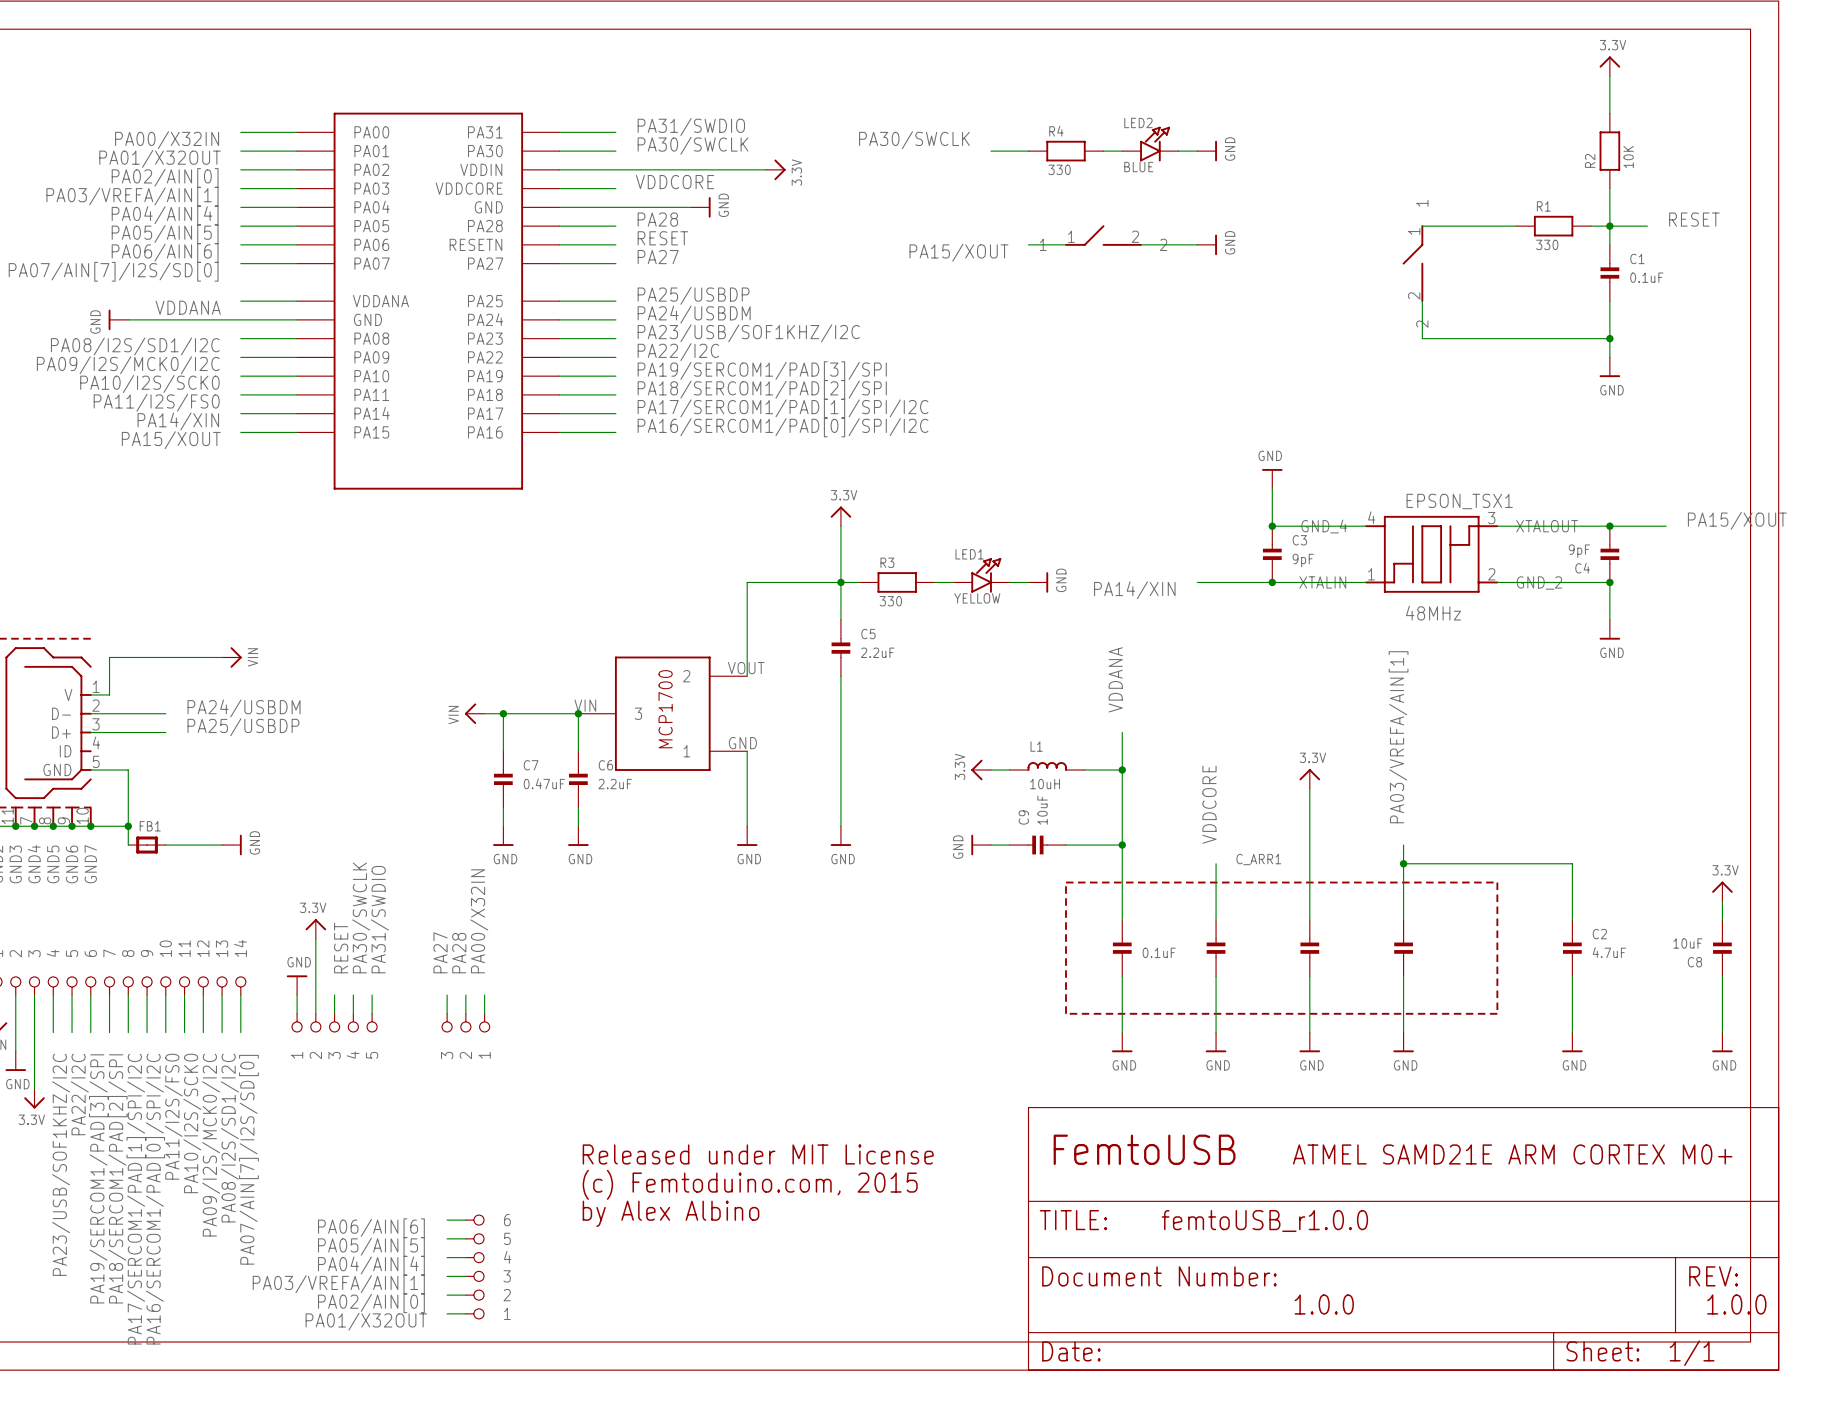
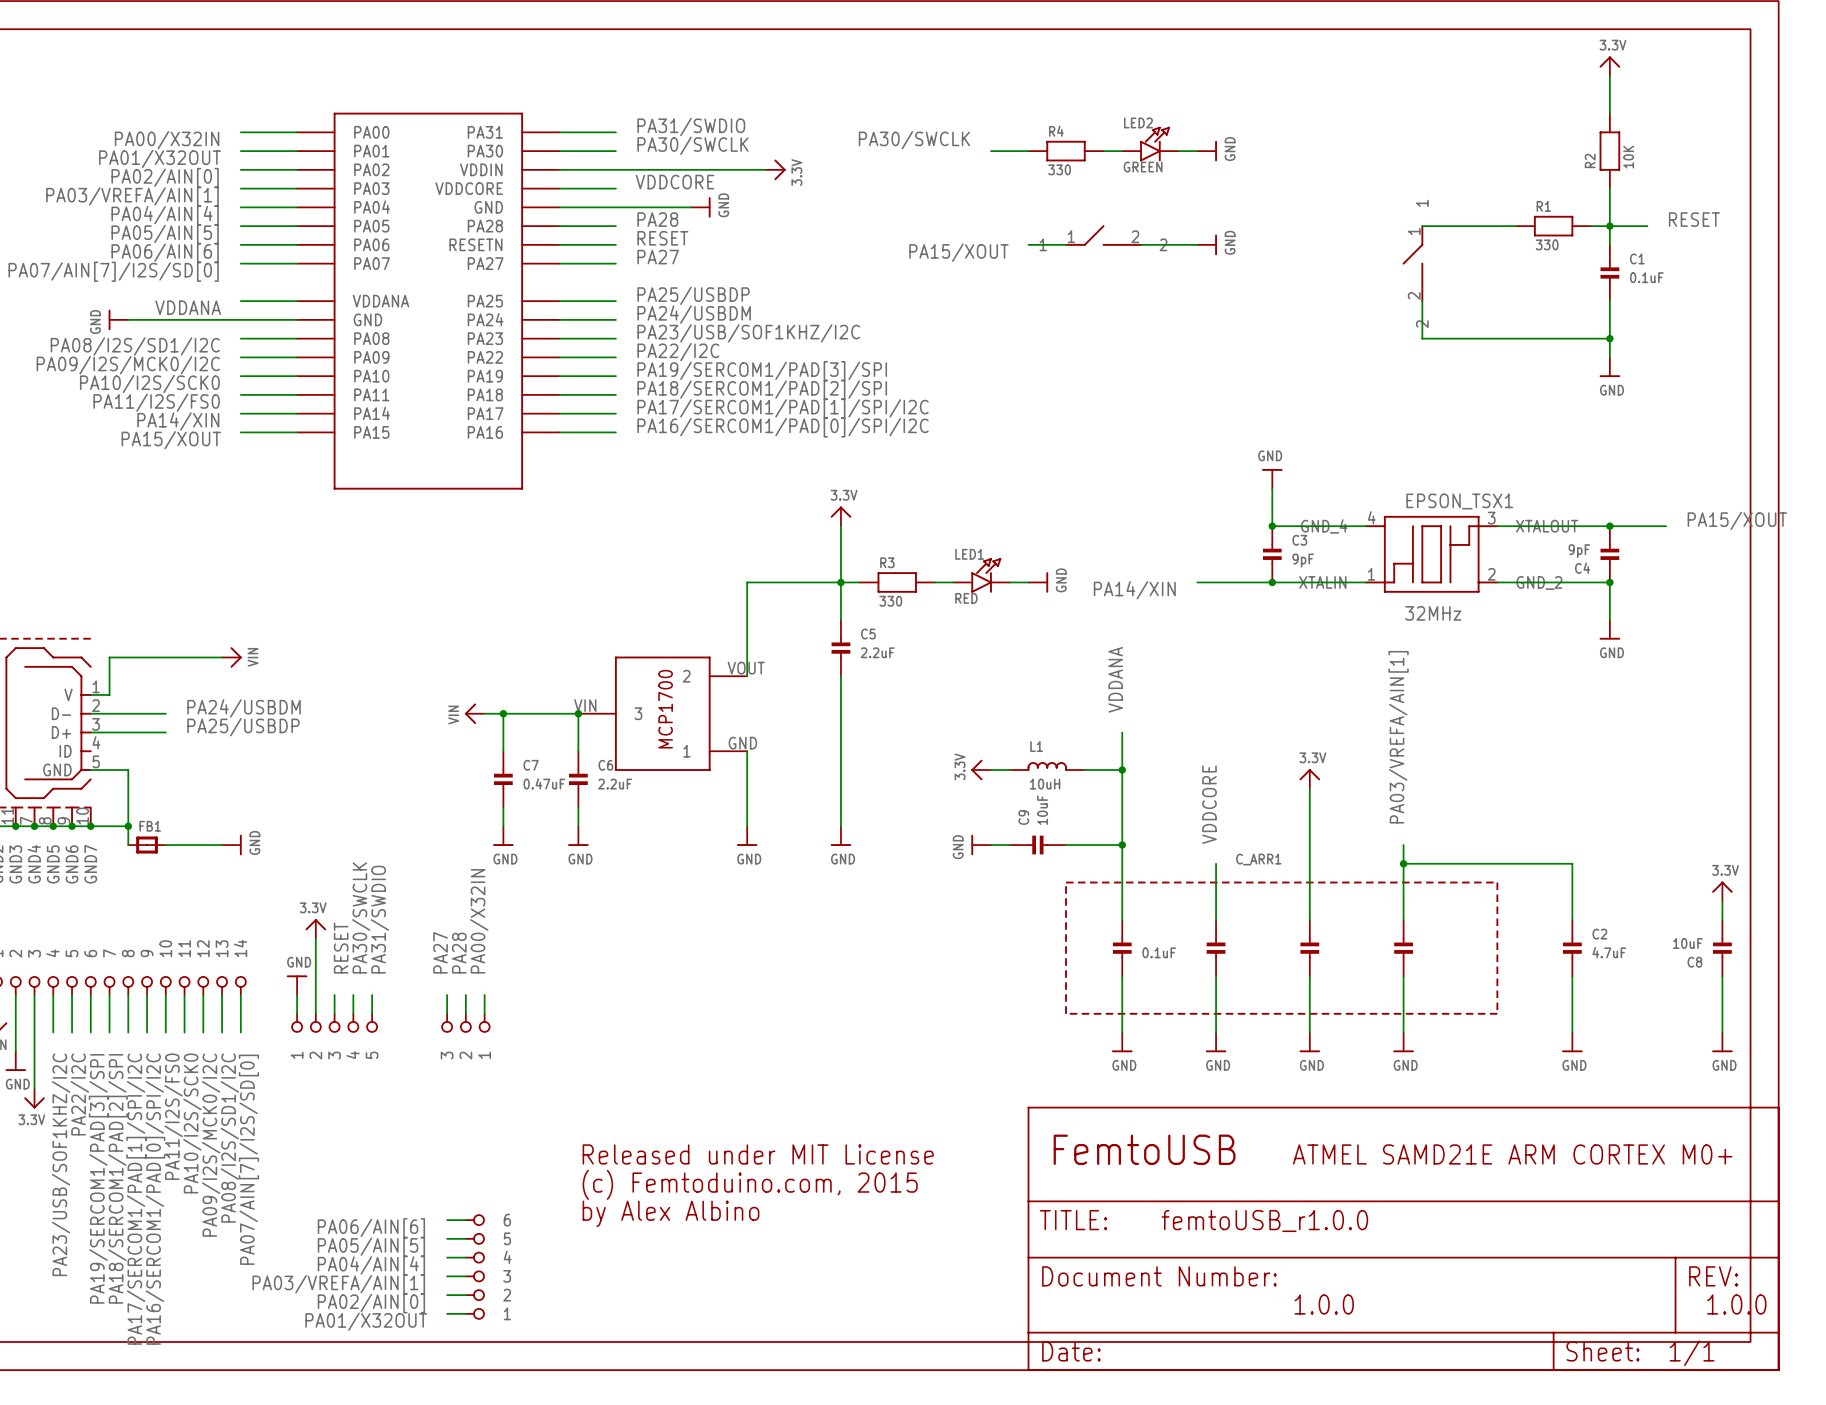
LED2 value: BLUE (1138, 167) -> GREEN (1143, 167)
LED1 value: YELLOW (977, 598) -> RED (966, 598)
EPSON_TSX1 value: 48MHz (1433, 613) -> 32MHz (1433, 613)

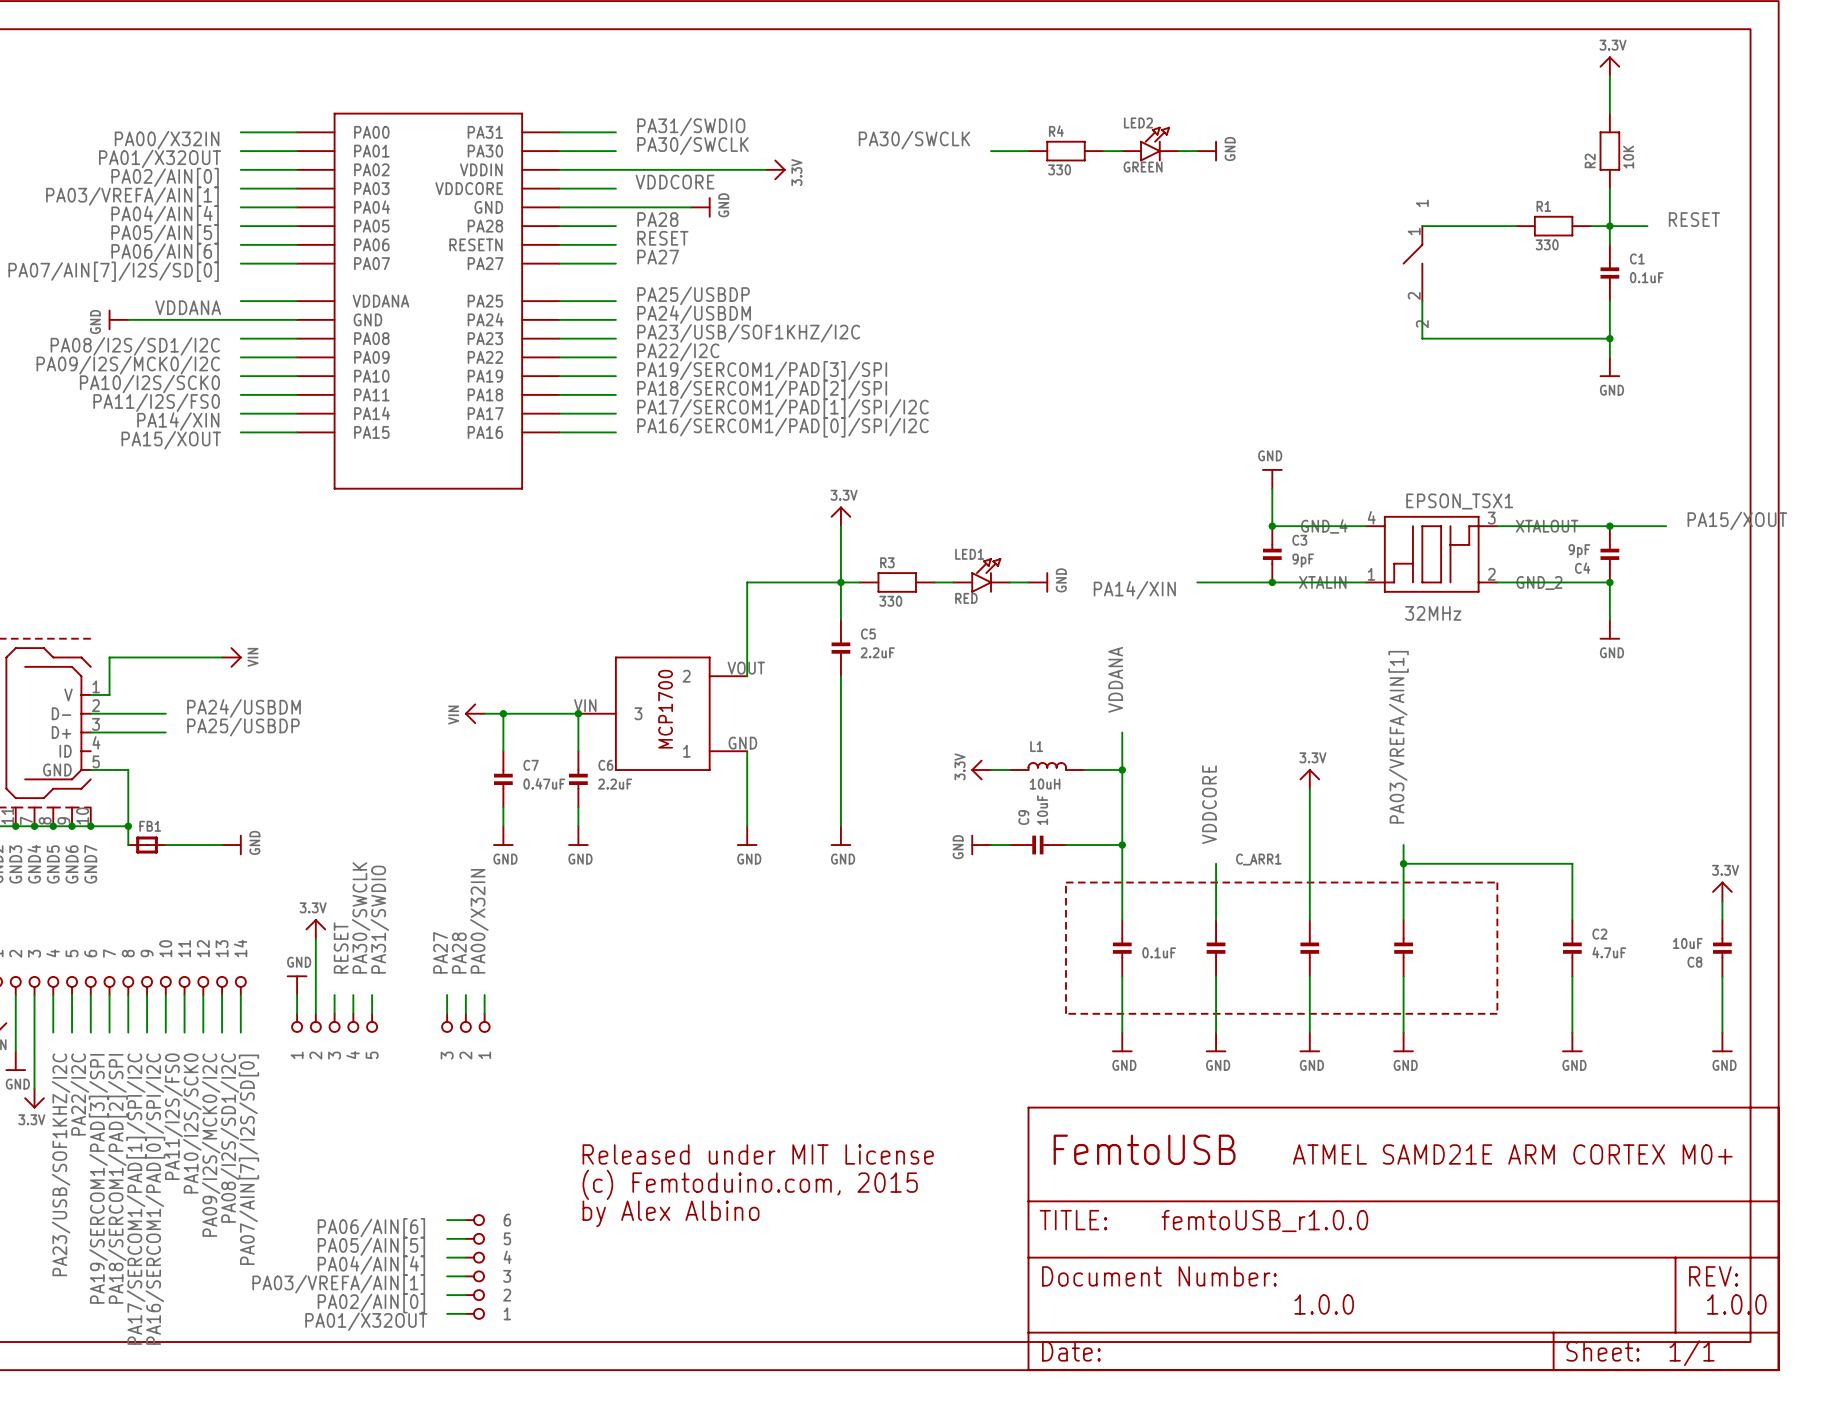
part: (1103, 235) -> none
wire: (1028, 244) (1066, 244) -> none
wire: (1141, 244) (1197, 244) -> none
power symbol: GND (1207, 244) -> none
label: PA15/XOUT (958, 252) -> none

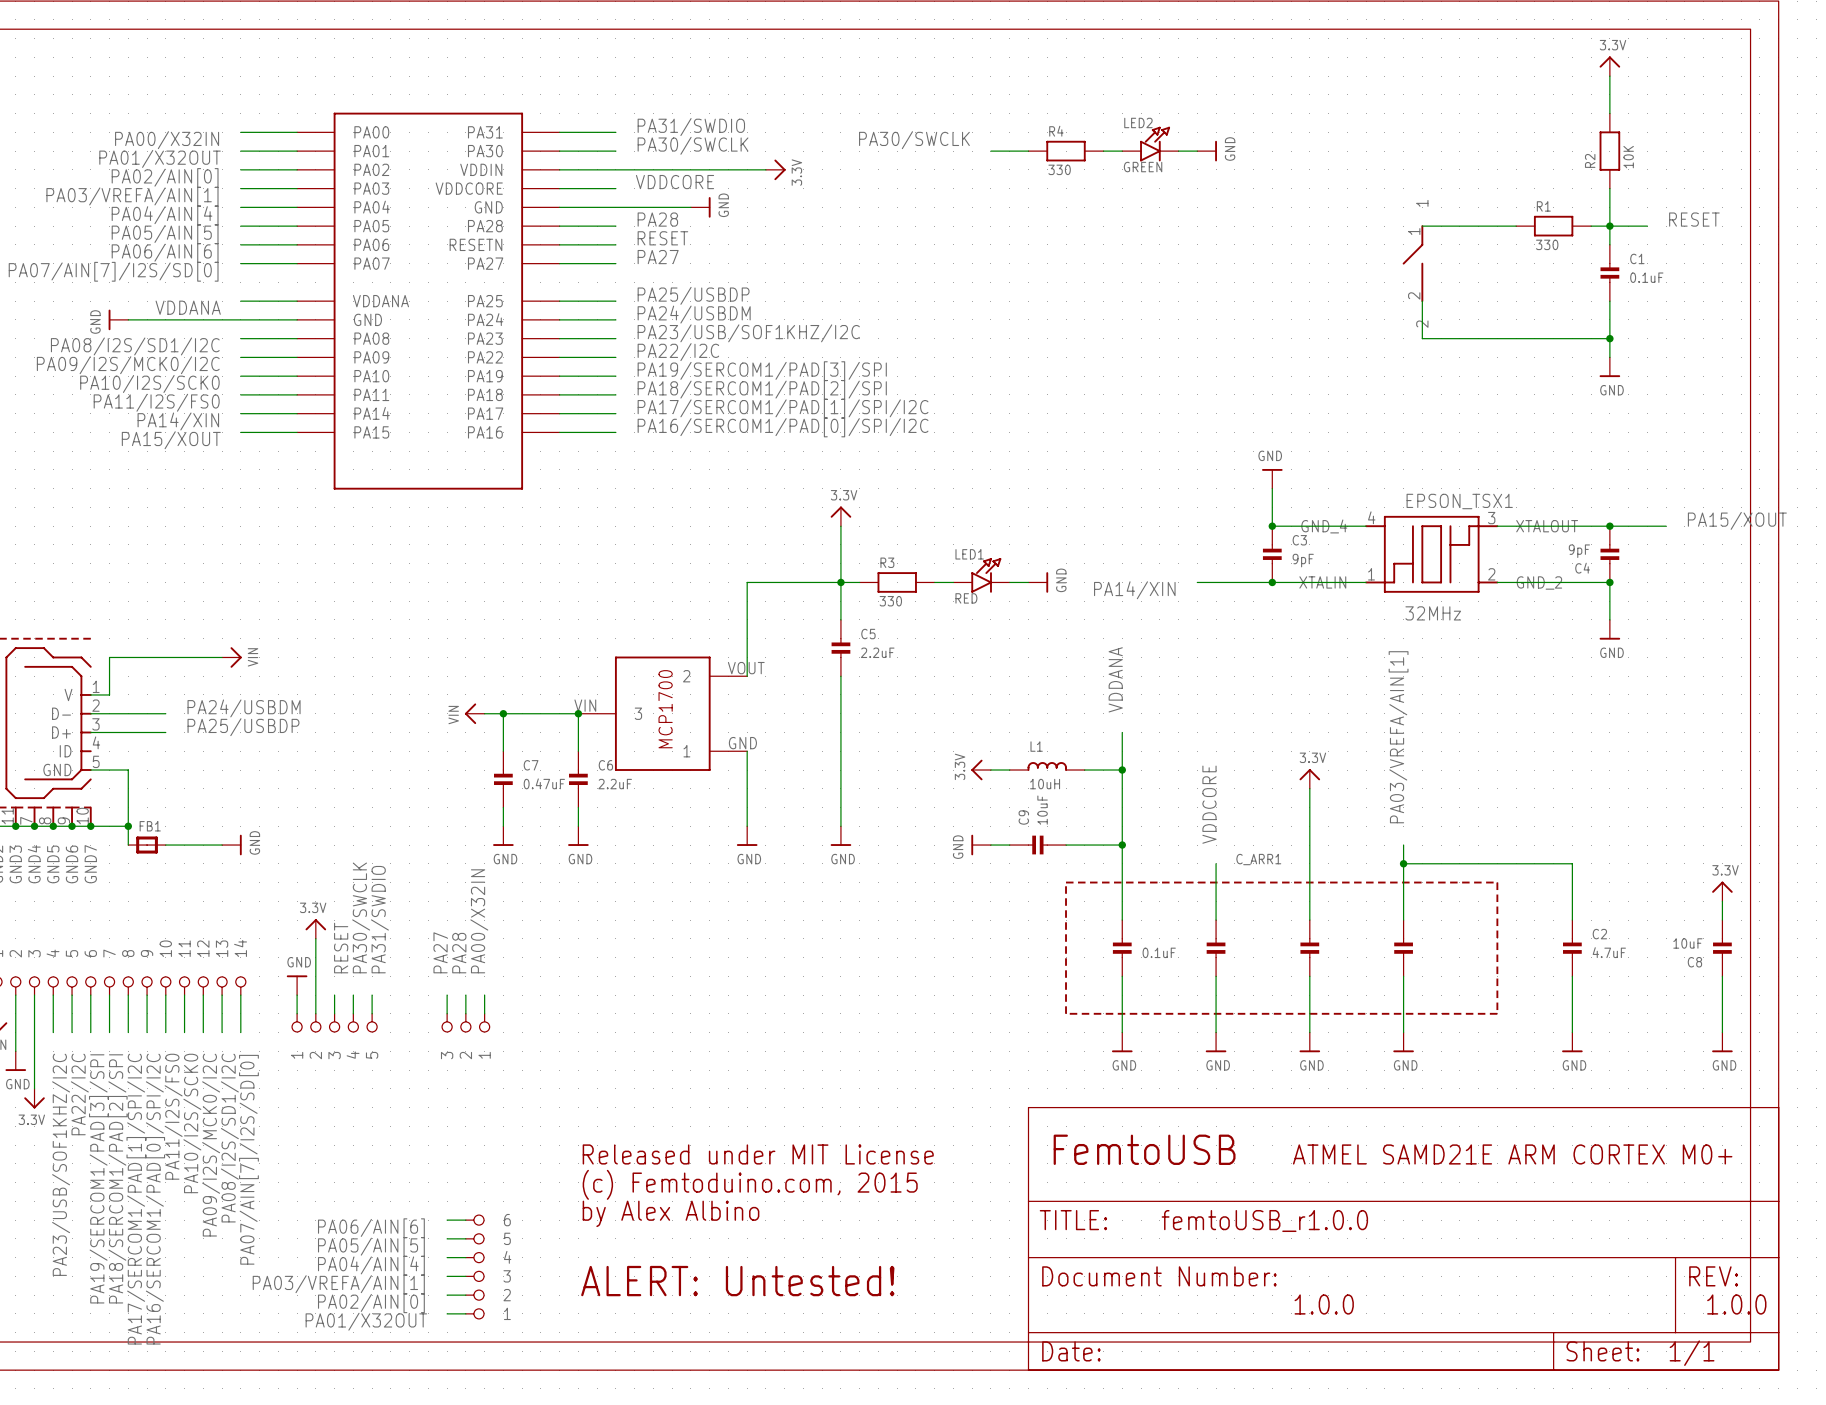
text: none -> ALERT: Untested! (737, 1281)

